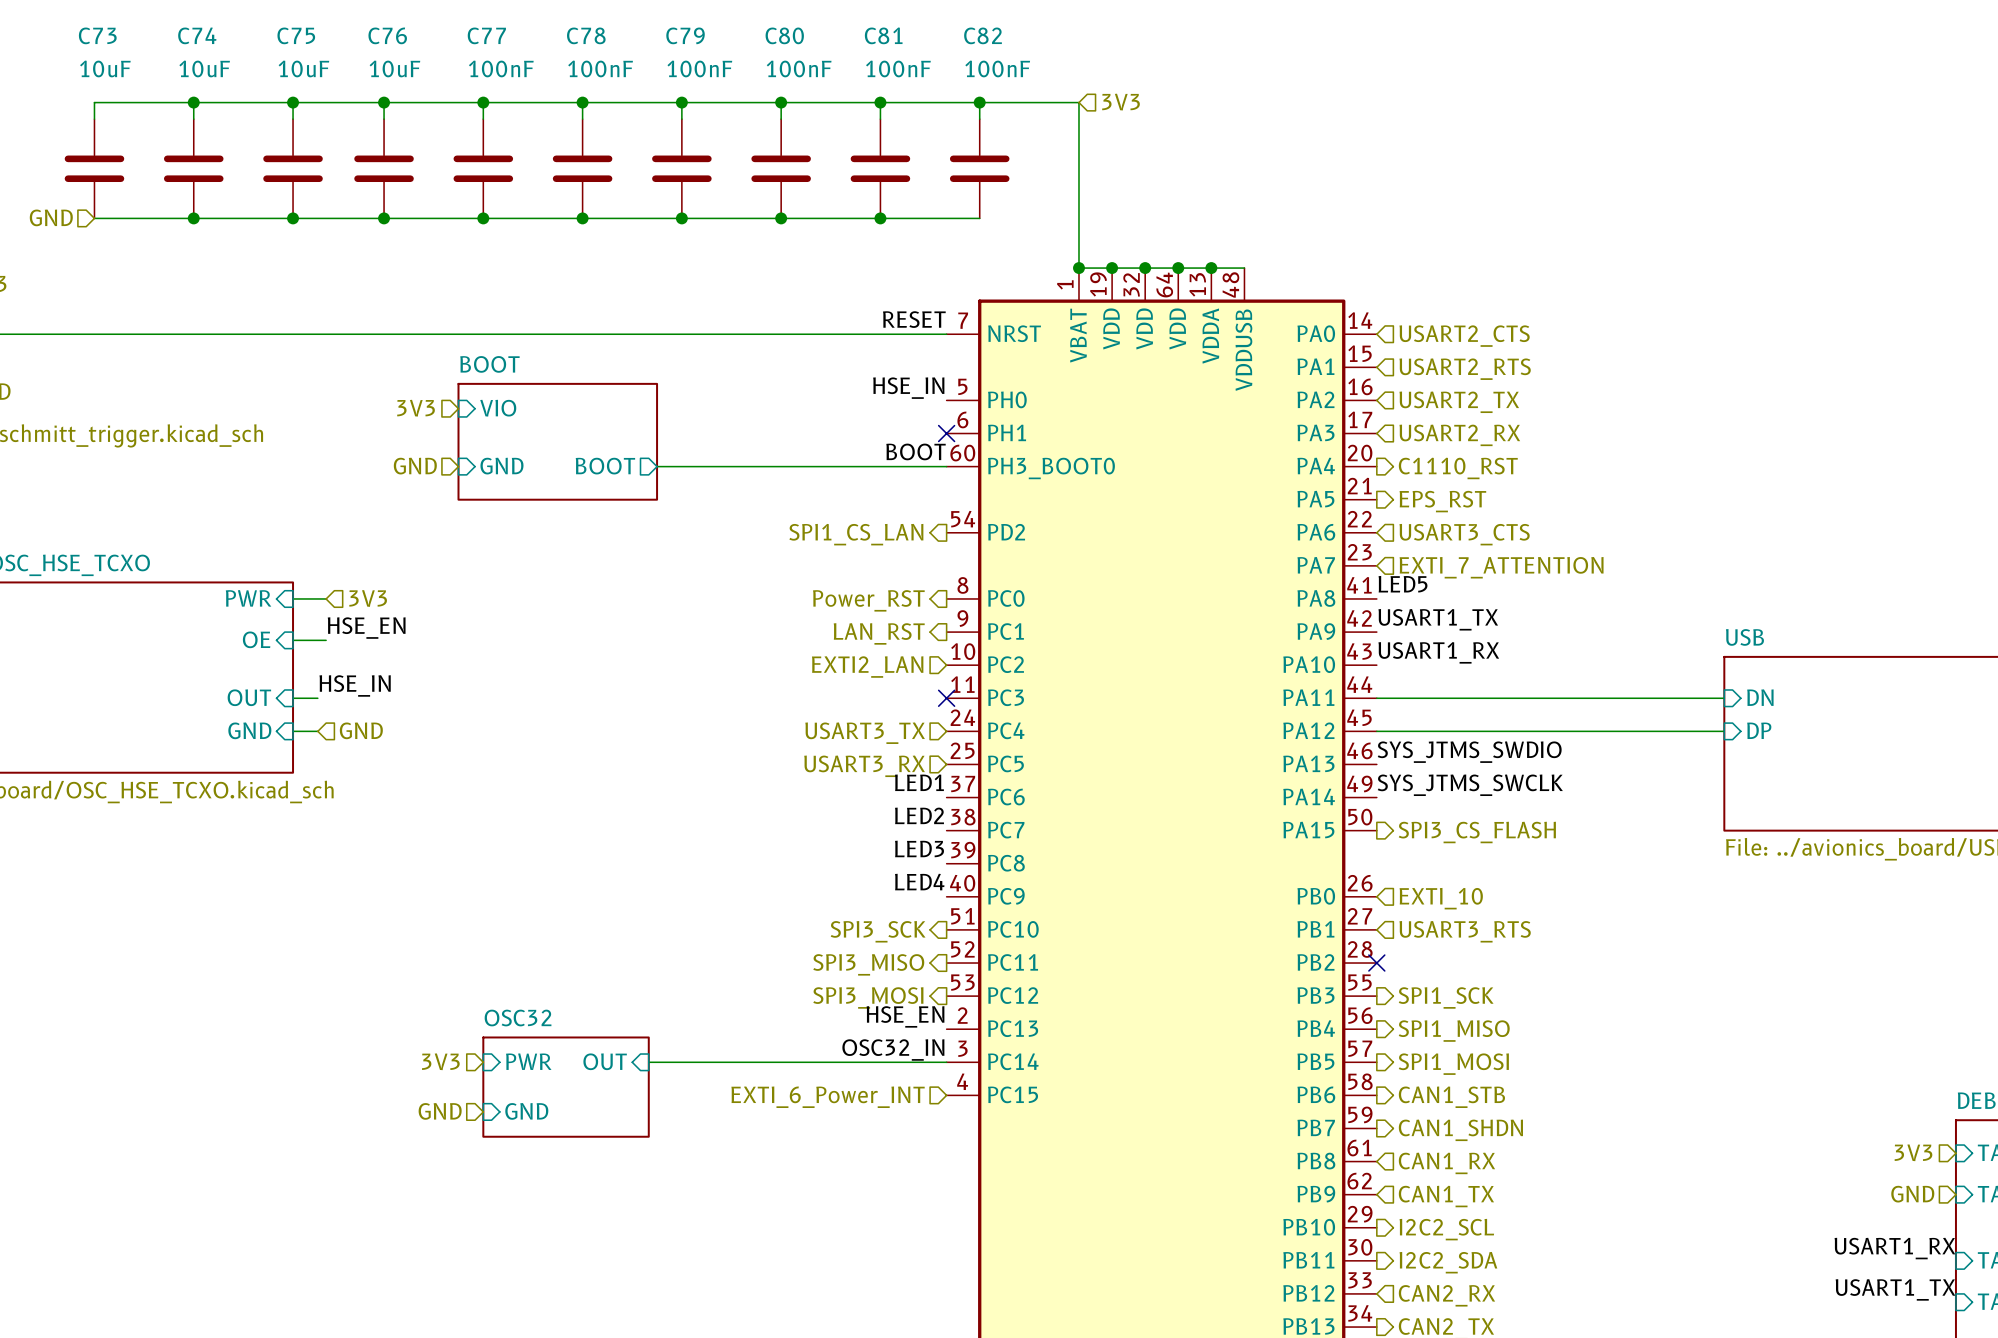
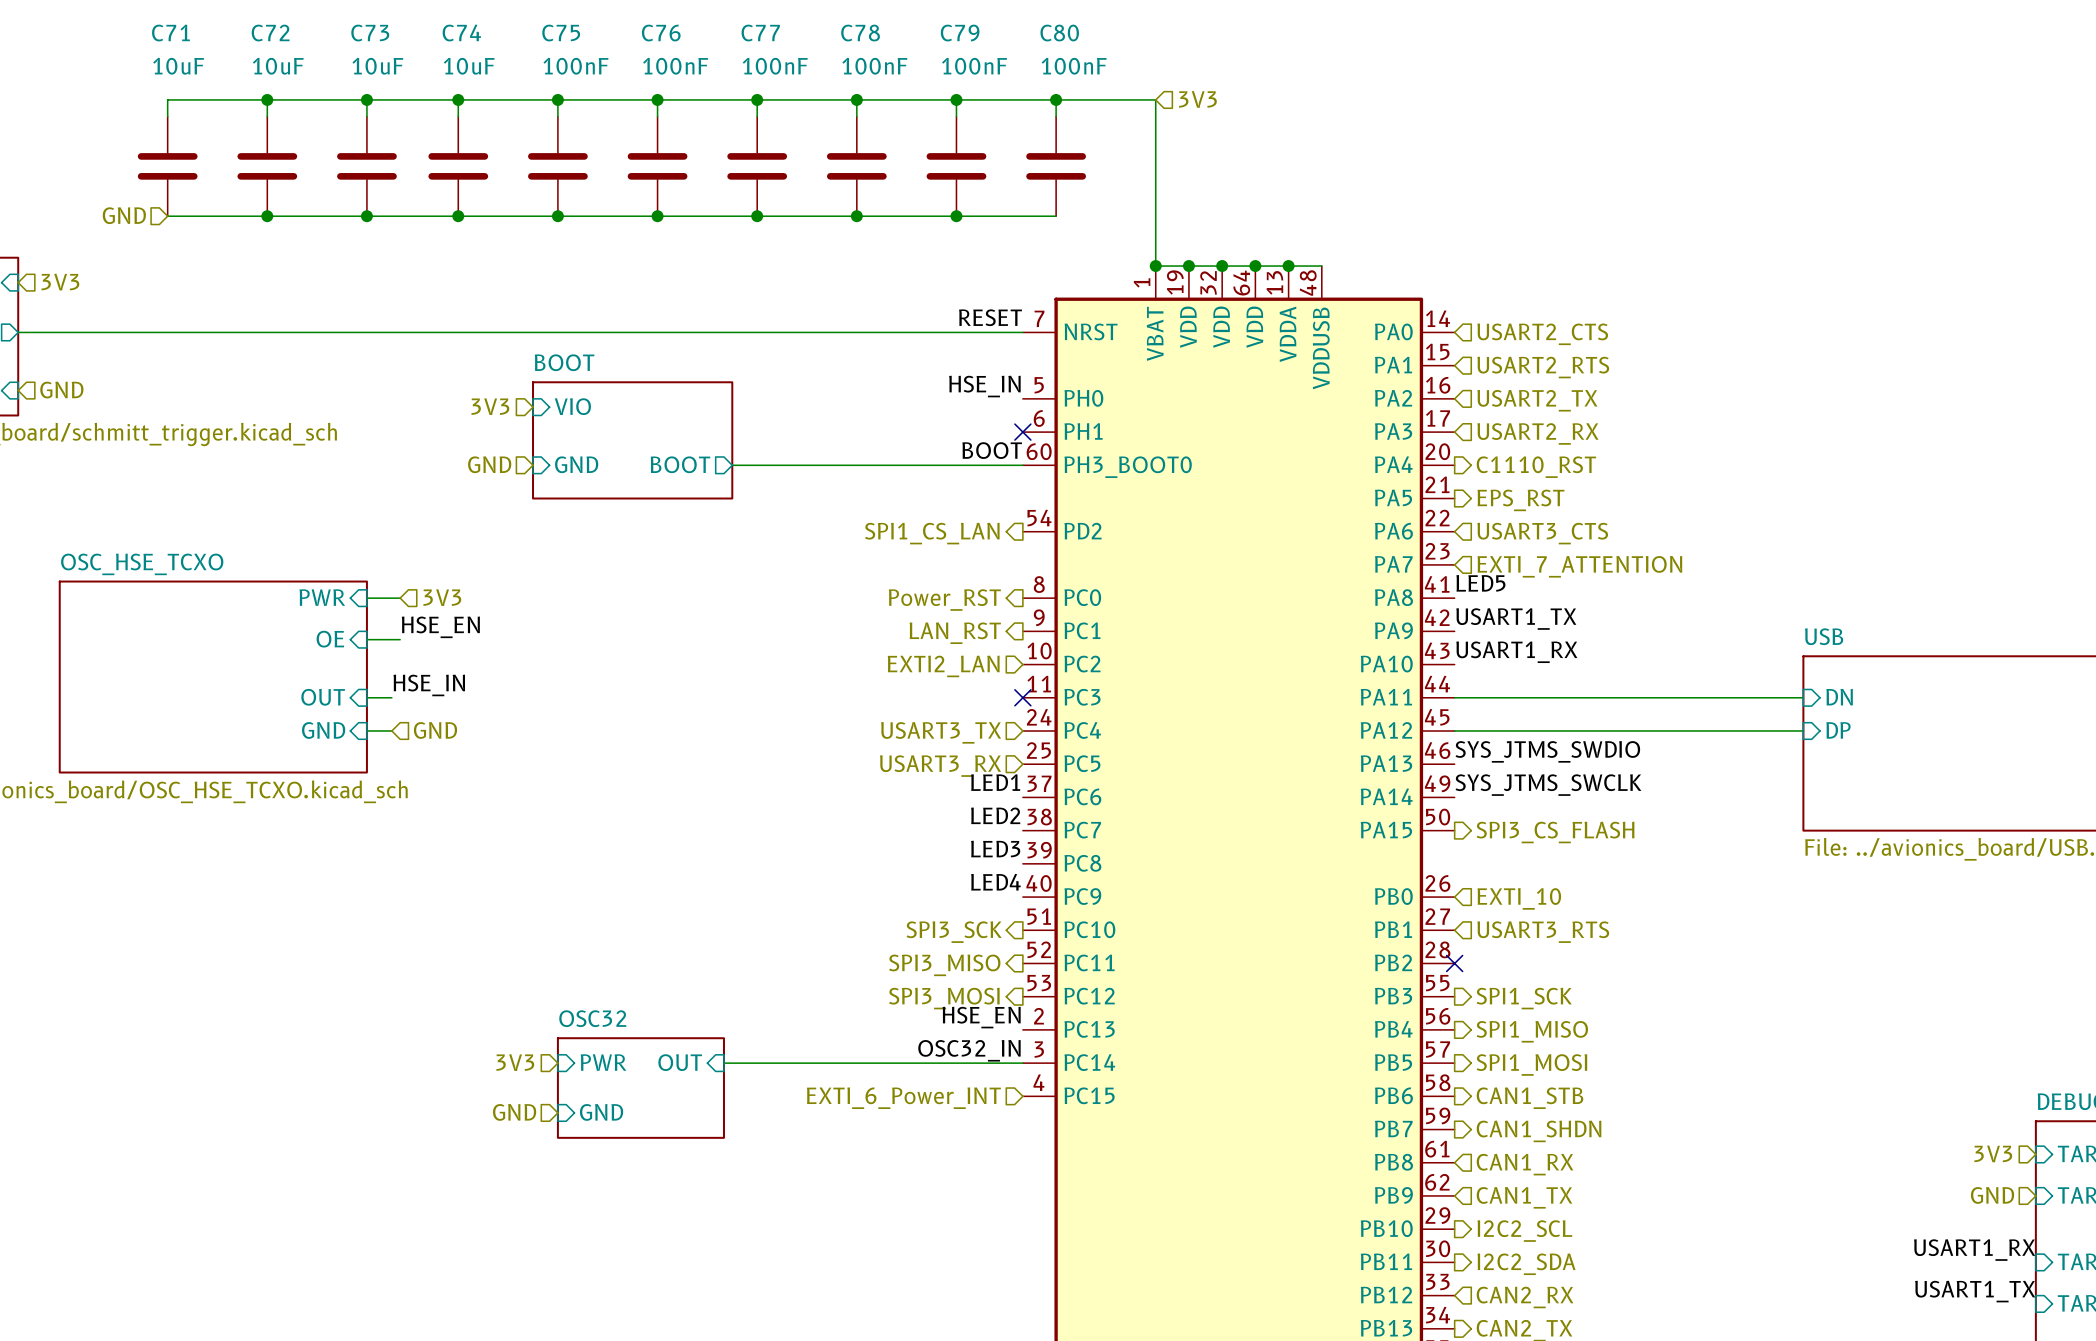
C73 name: C73 (97, 35) -> C71 (170, 33)
C74 name: C74 (197, 35) -> C72 (270, 33)
C75 name: C75 (296, 35) -> C73 (370, 33)
C76 name: C76 (387, 35) -> C74 (461, 33)
C77 name: C77 (486, 35) -> C75 (561, 33)
C78 name: C78 (586, 35) -> C76 (661, 33)
C79 name: C79 (685, 35) -> C77 (760, 33)
C80 name: C80 (784, 35) -> C78 (860, 33)
C81 name: C81 (883, 35) -> C79 (960, 33)
C82 name: C82 (983, 35) -> C80 (1059, 33)

